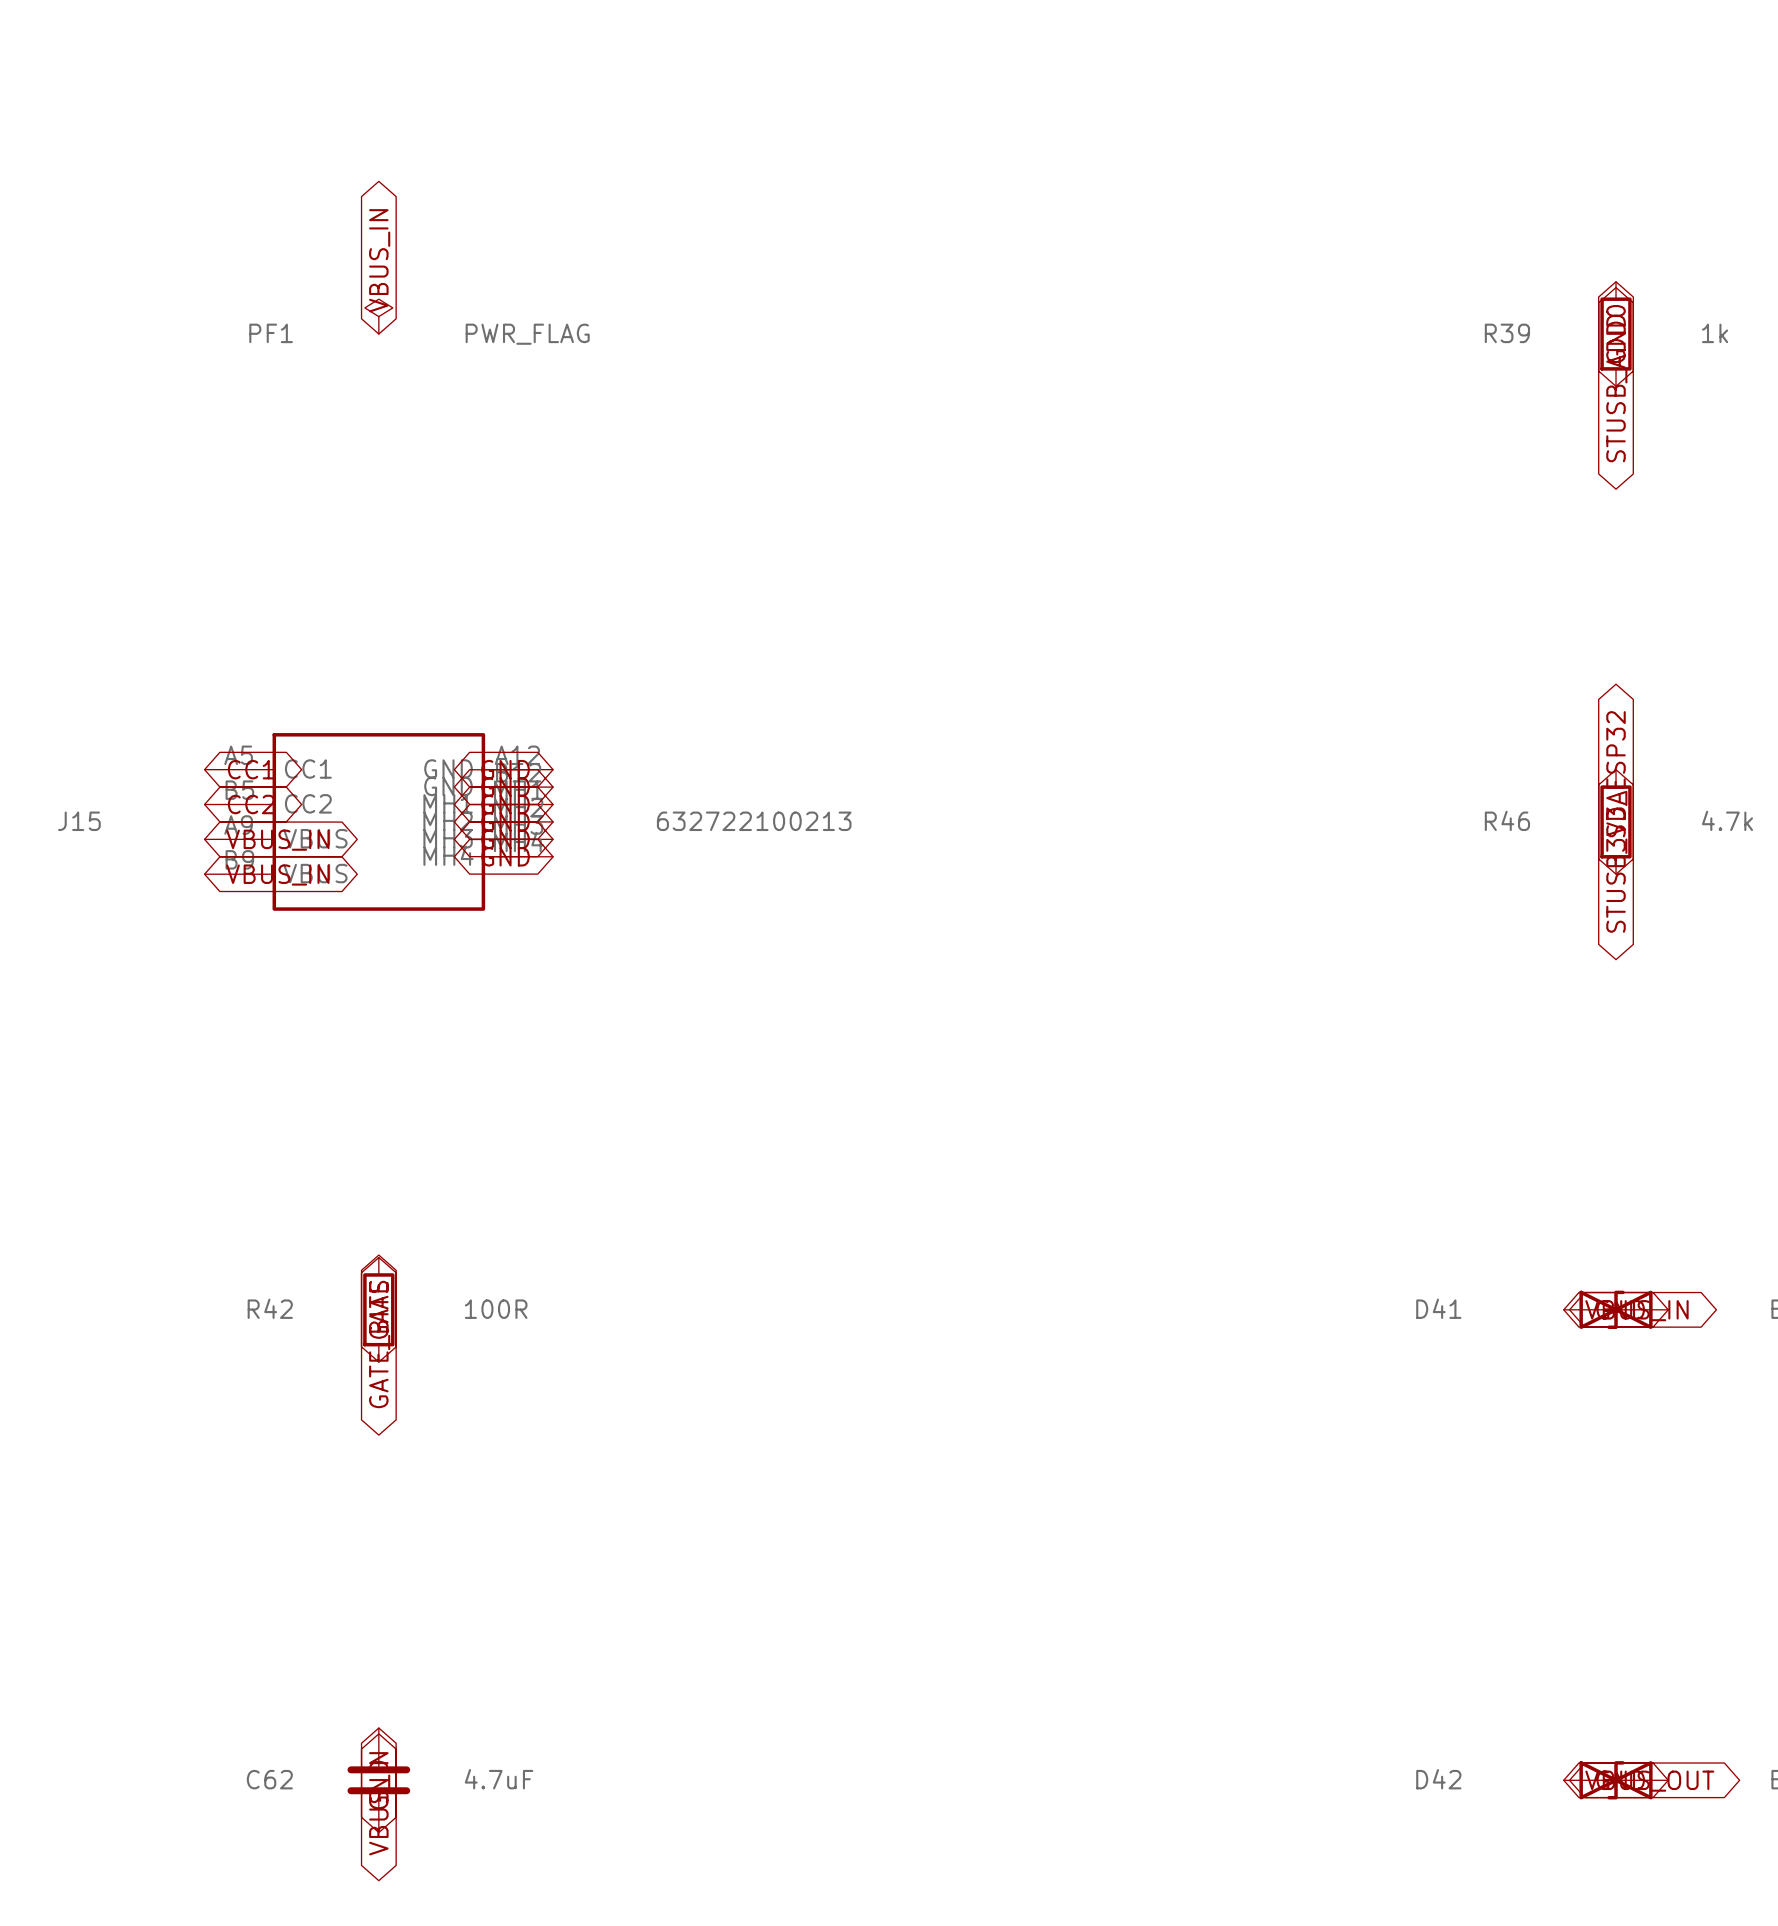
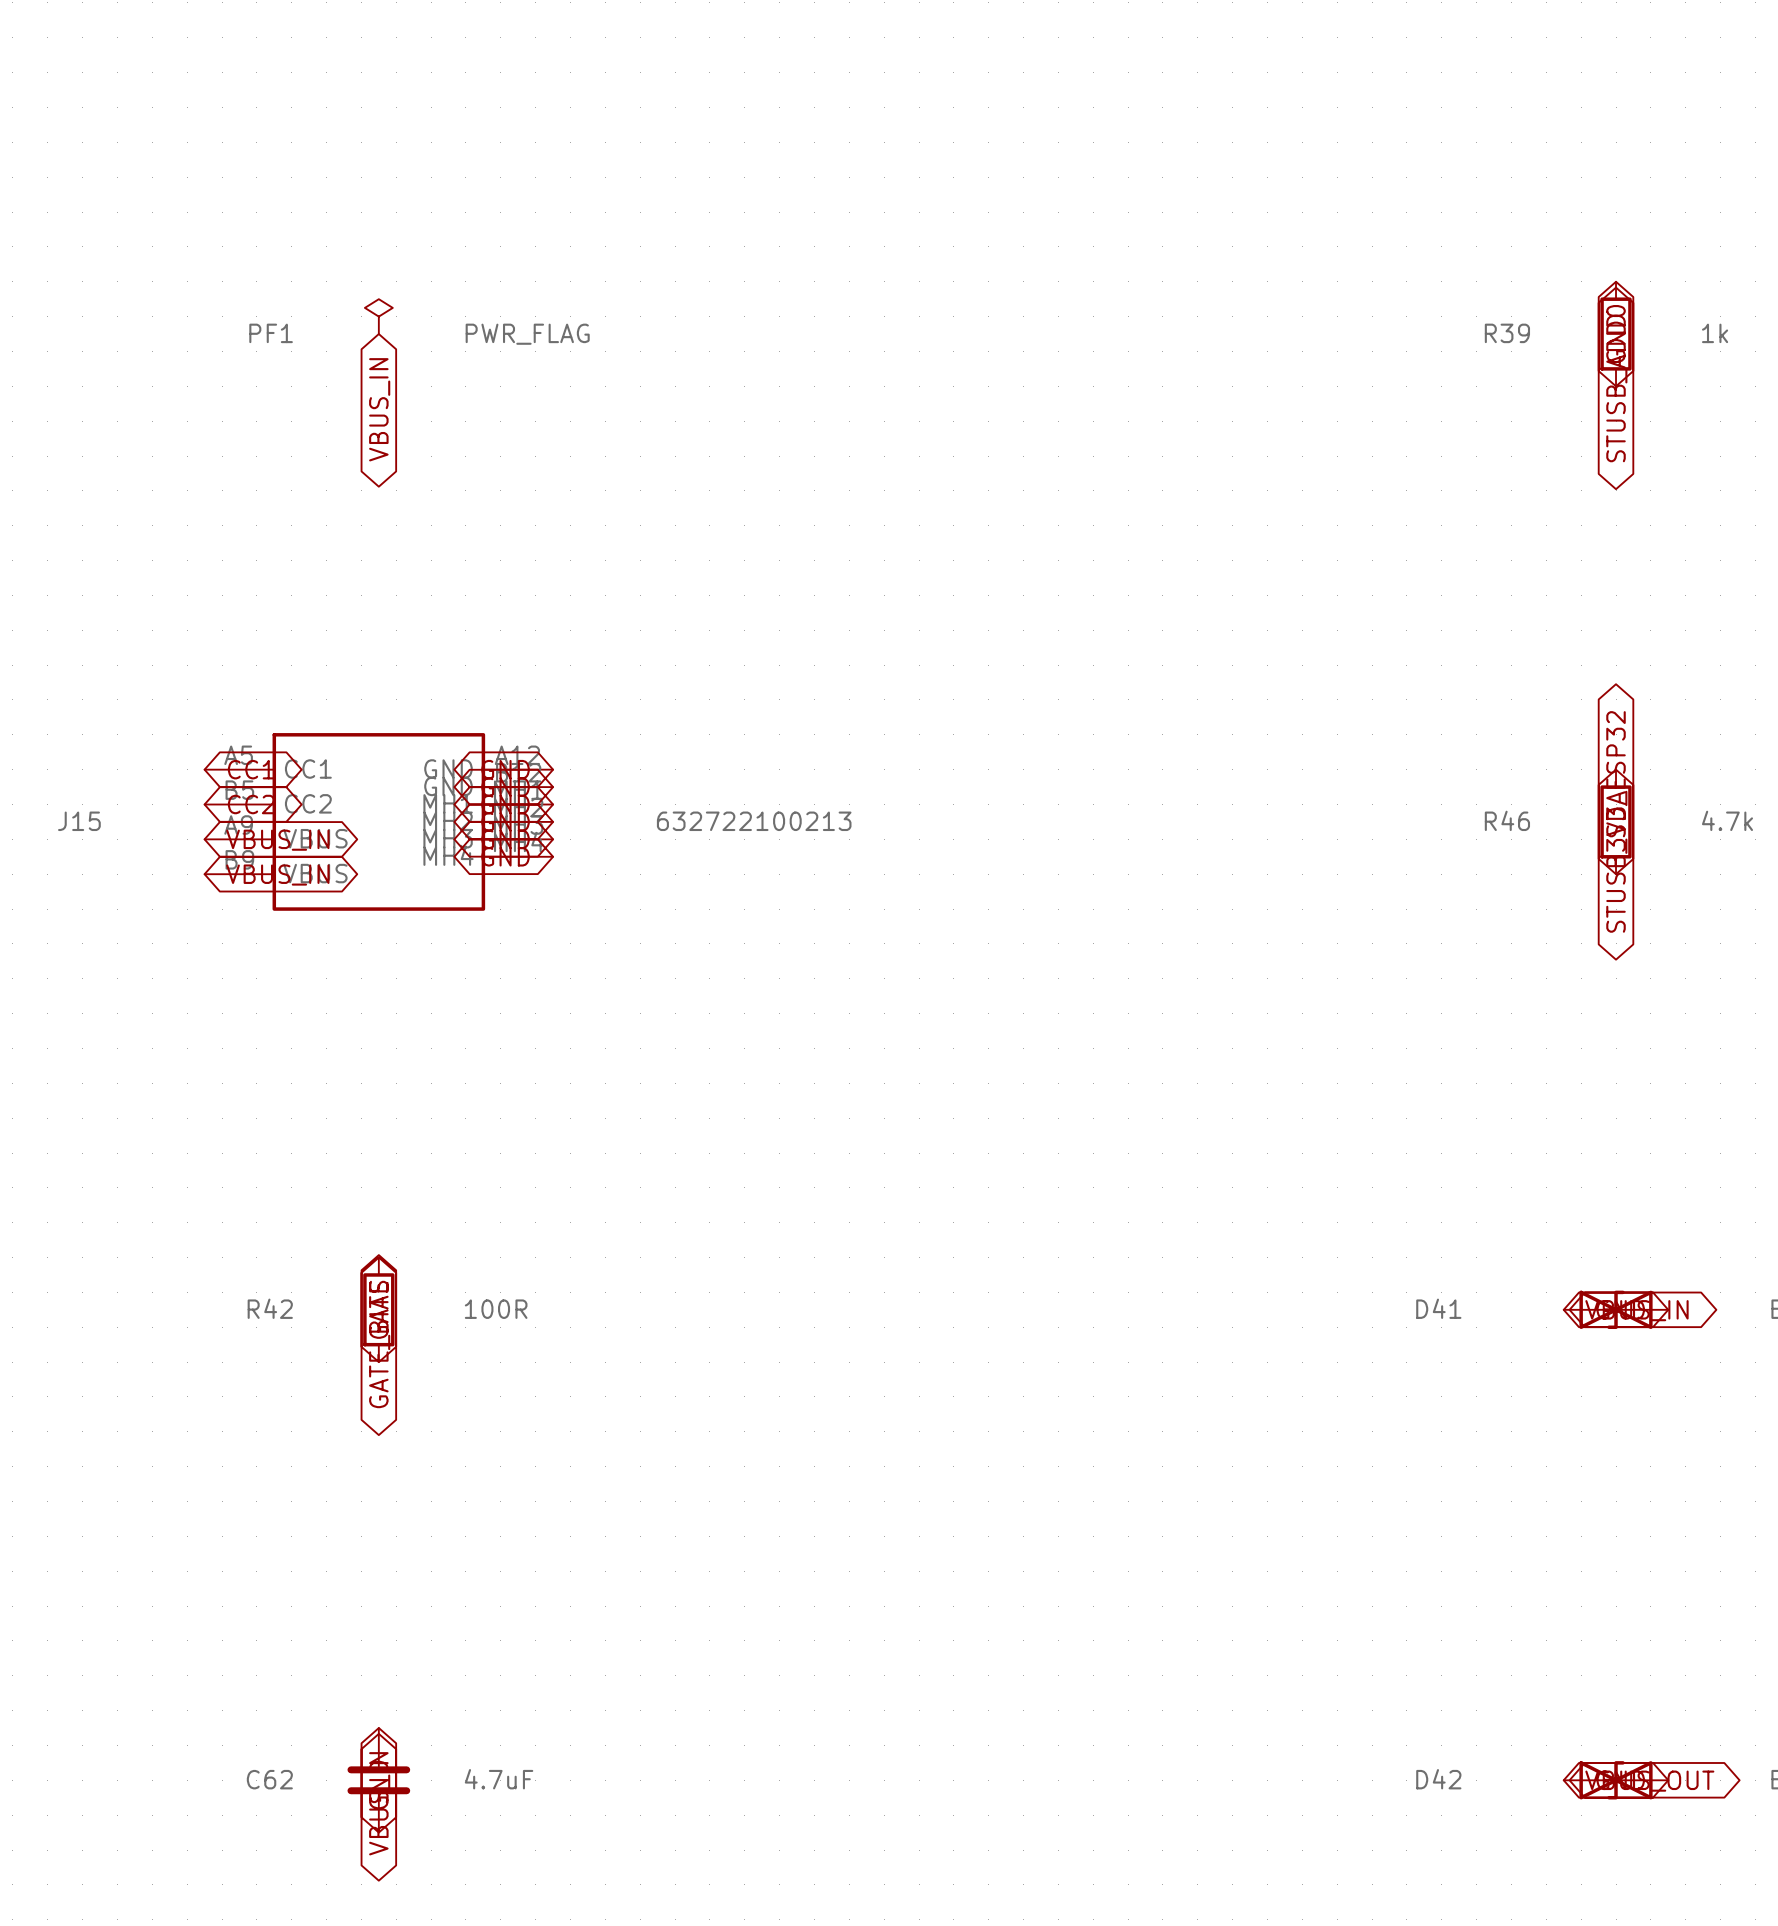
global label rotation: 0° (379, 260) -> 180° (379, 409)

